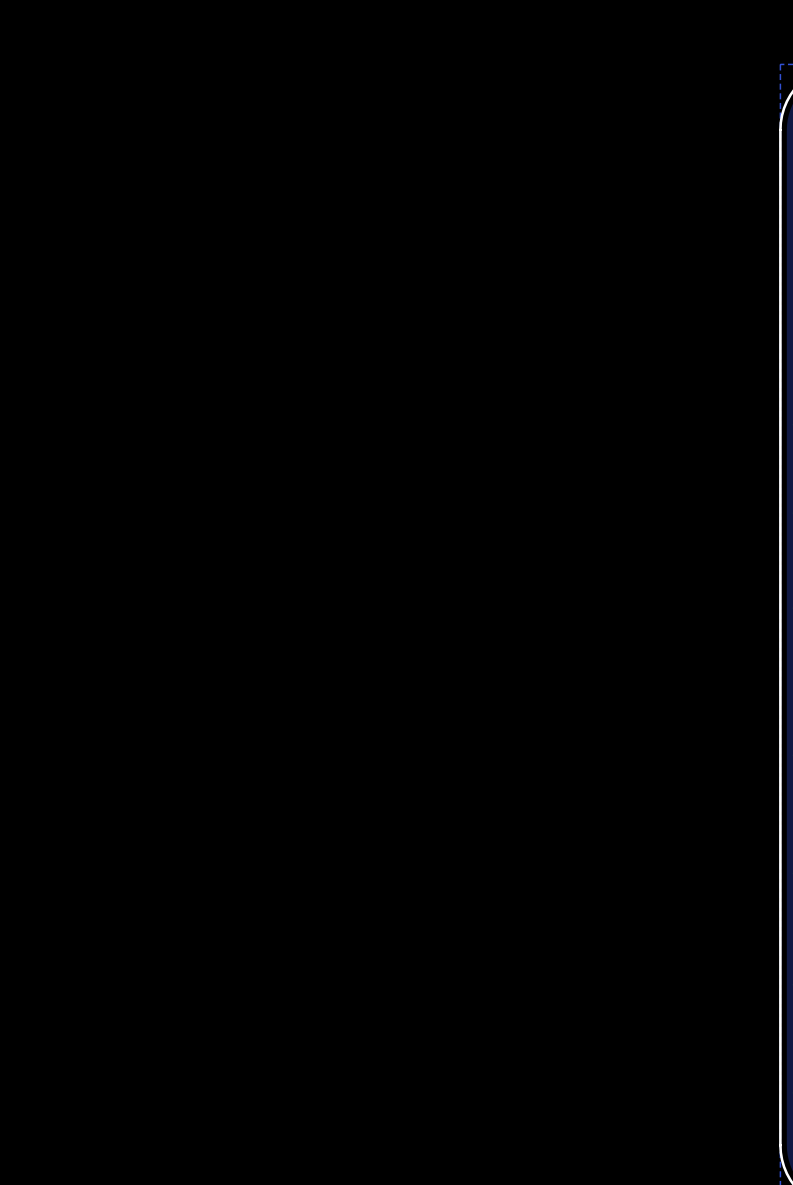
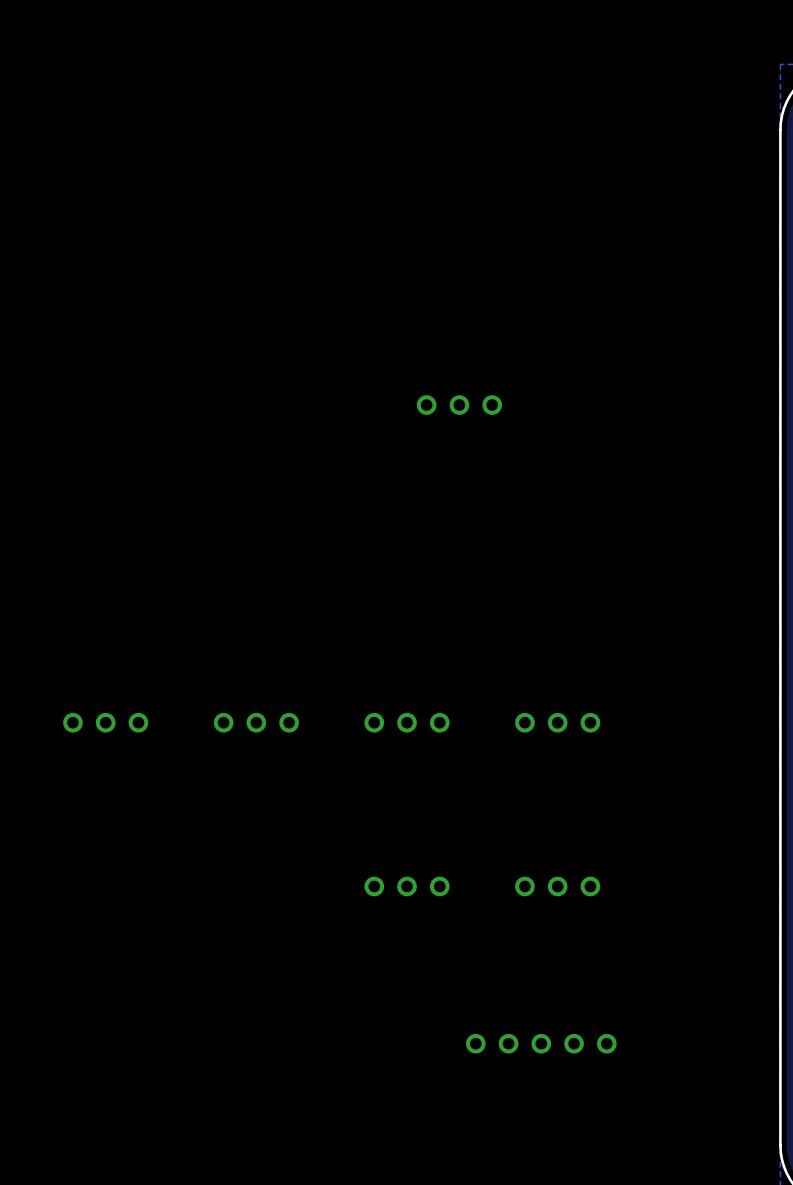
part: none -> (459, 405)
part: none -> (105, 722)
part: none -> (256, 722)
part: none -> (407, 722)
part: none -> (557, 722)
part: none -> (407, 886)
part: none -> (557, 886)
part: none -> (541, 1043)

